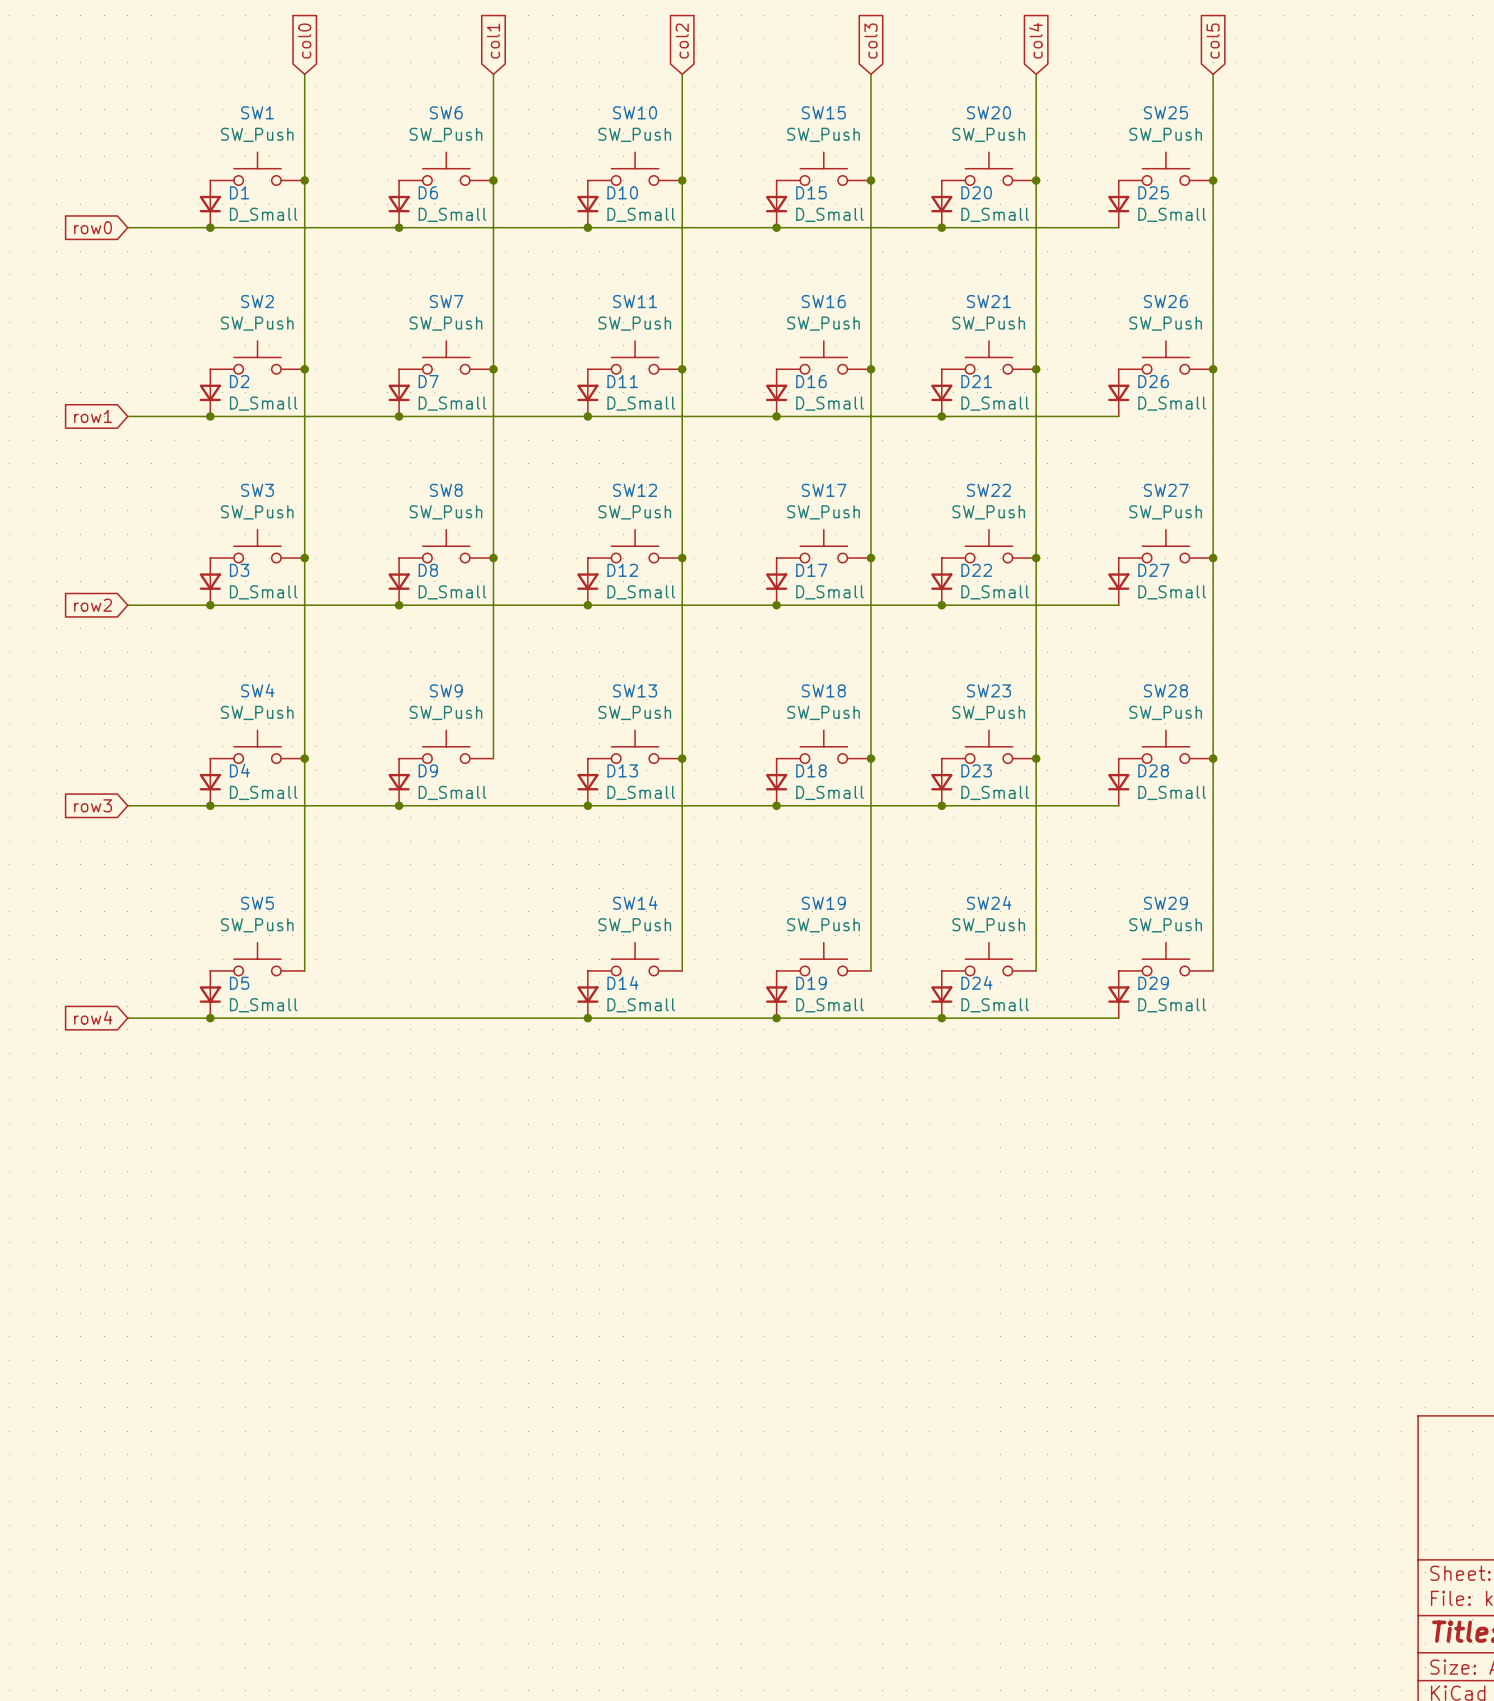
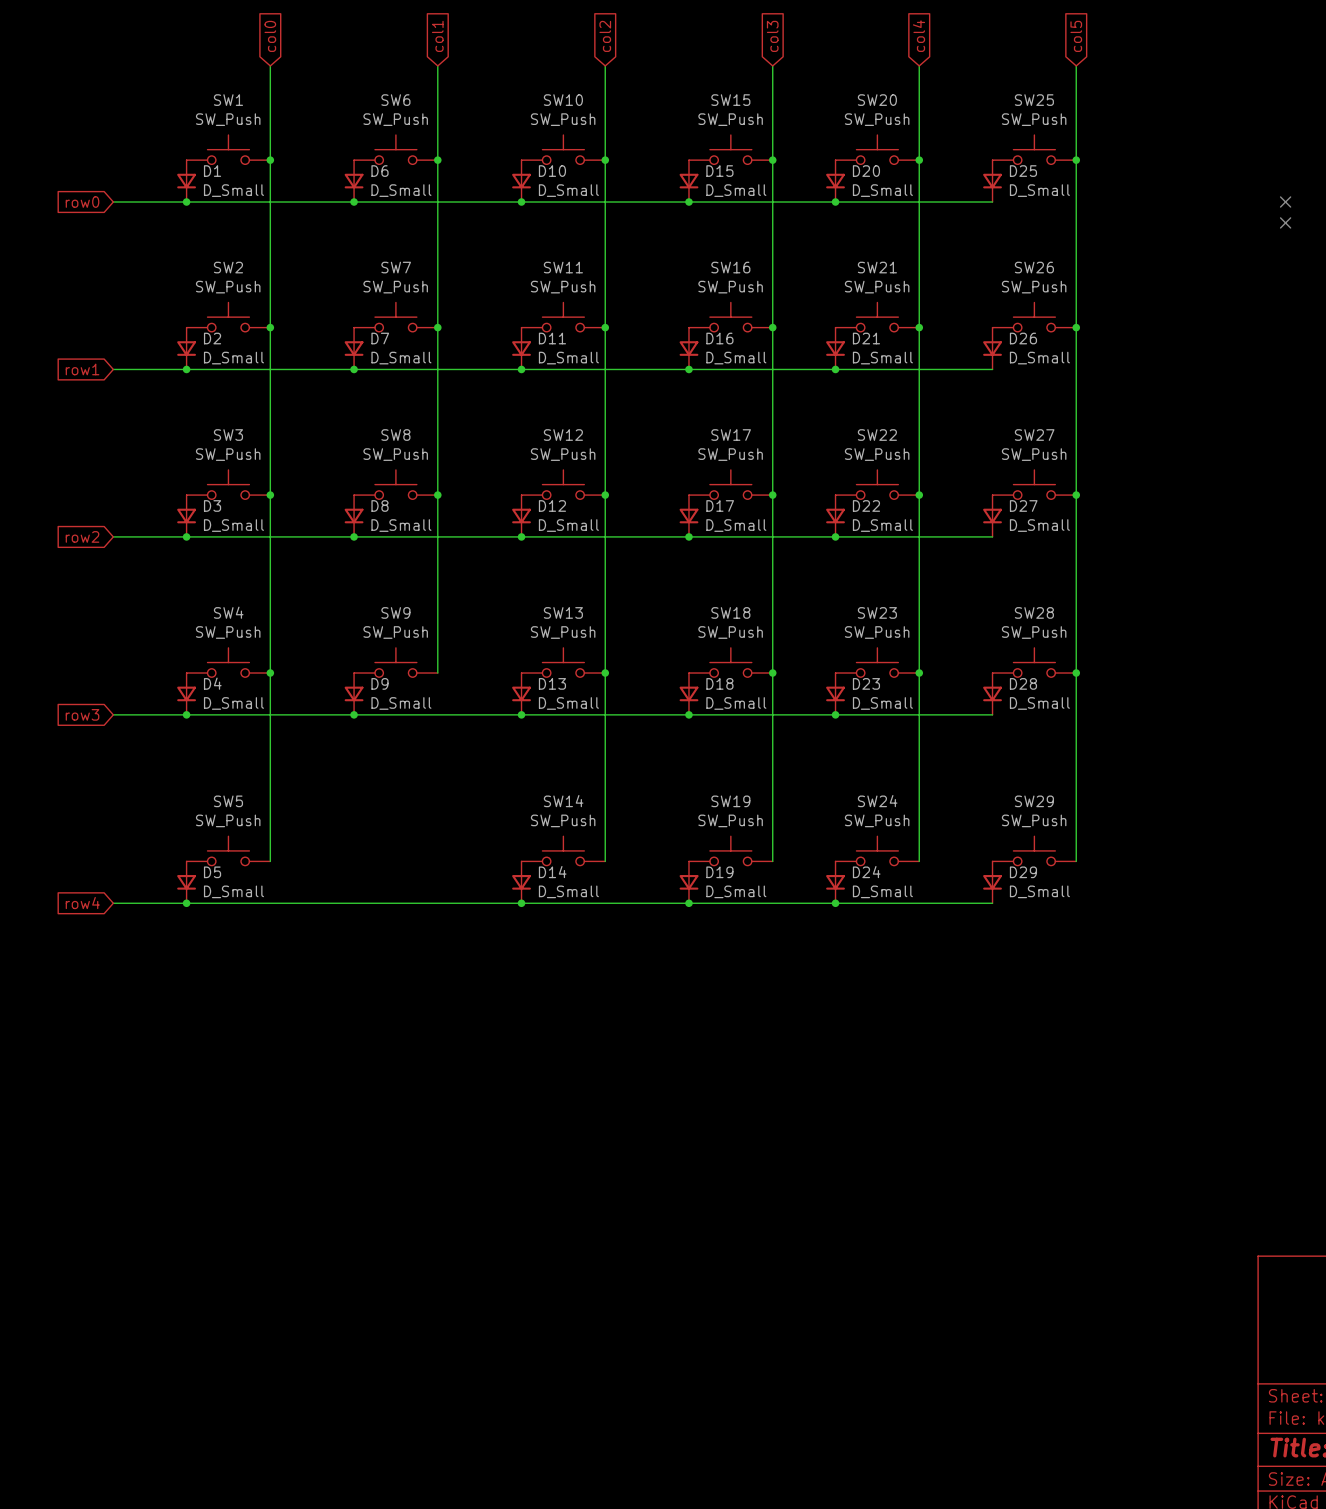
no-connect mark: none -> (1285, 202)
no-connect mark: none -> (1285, 222)

